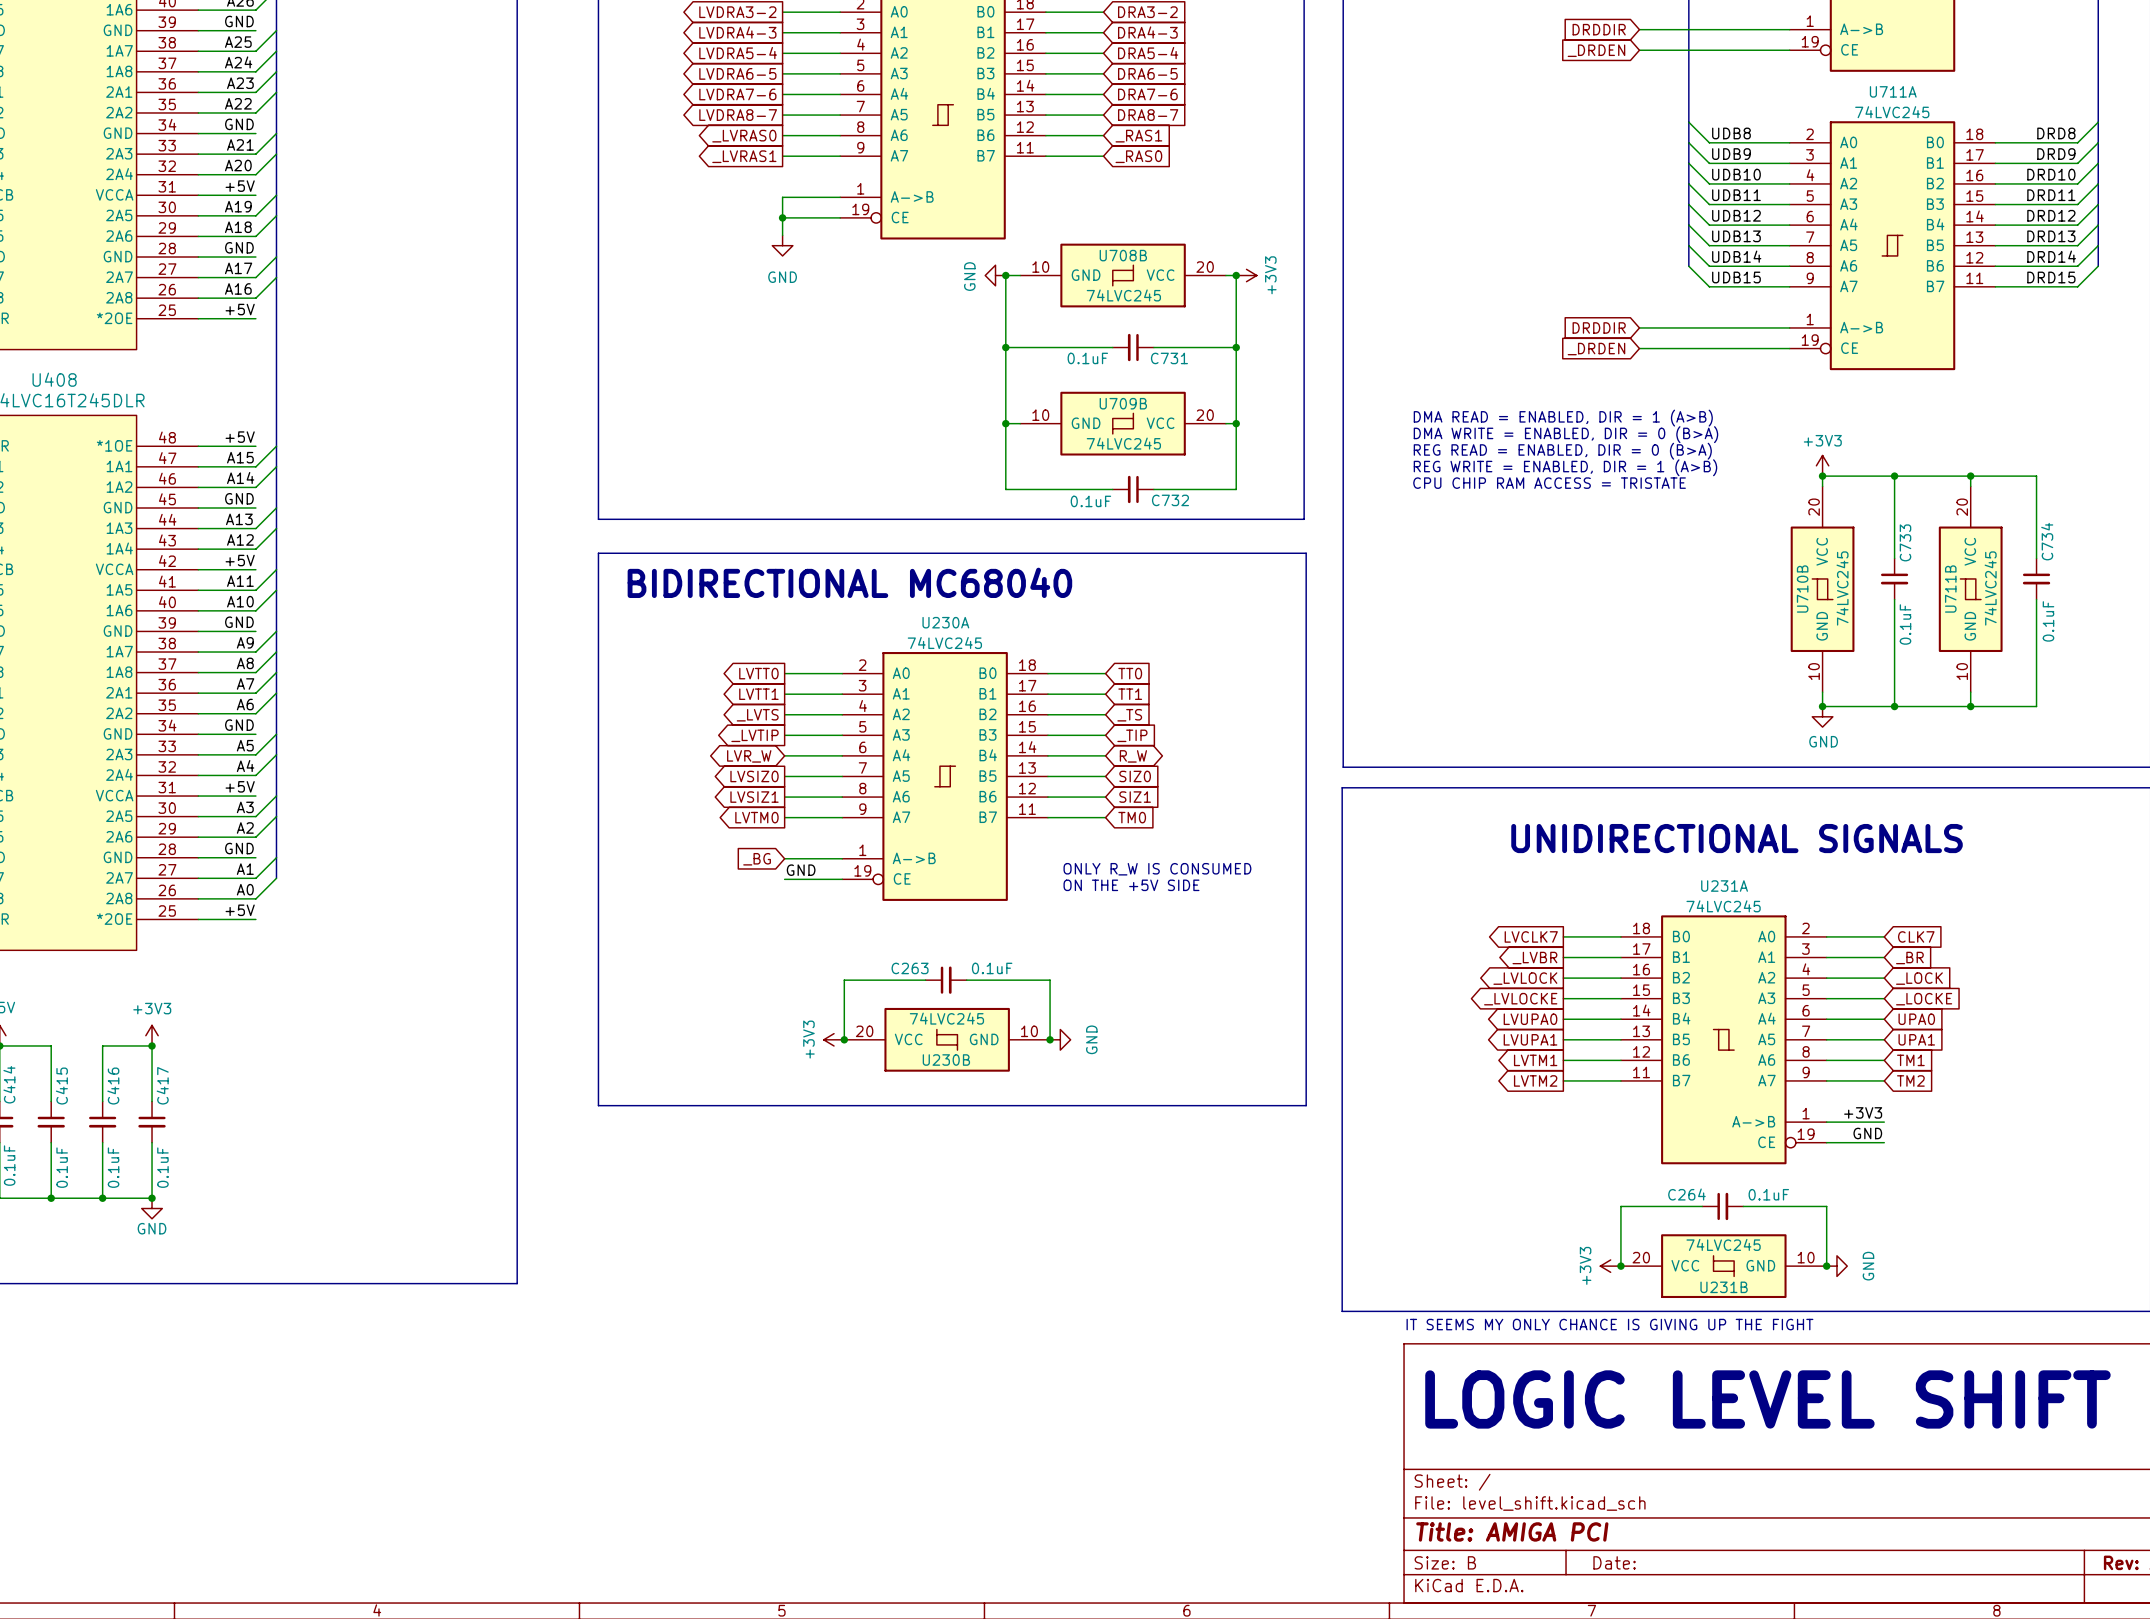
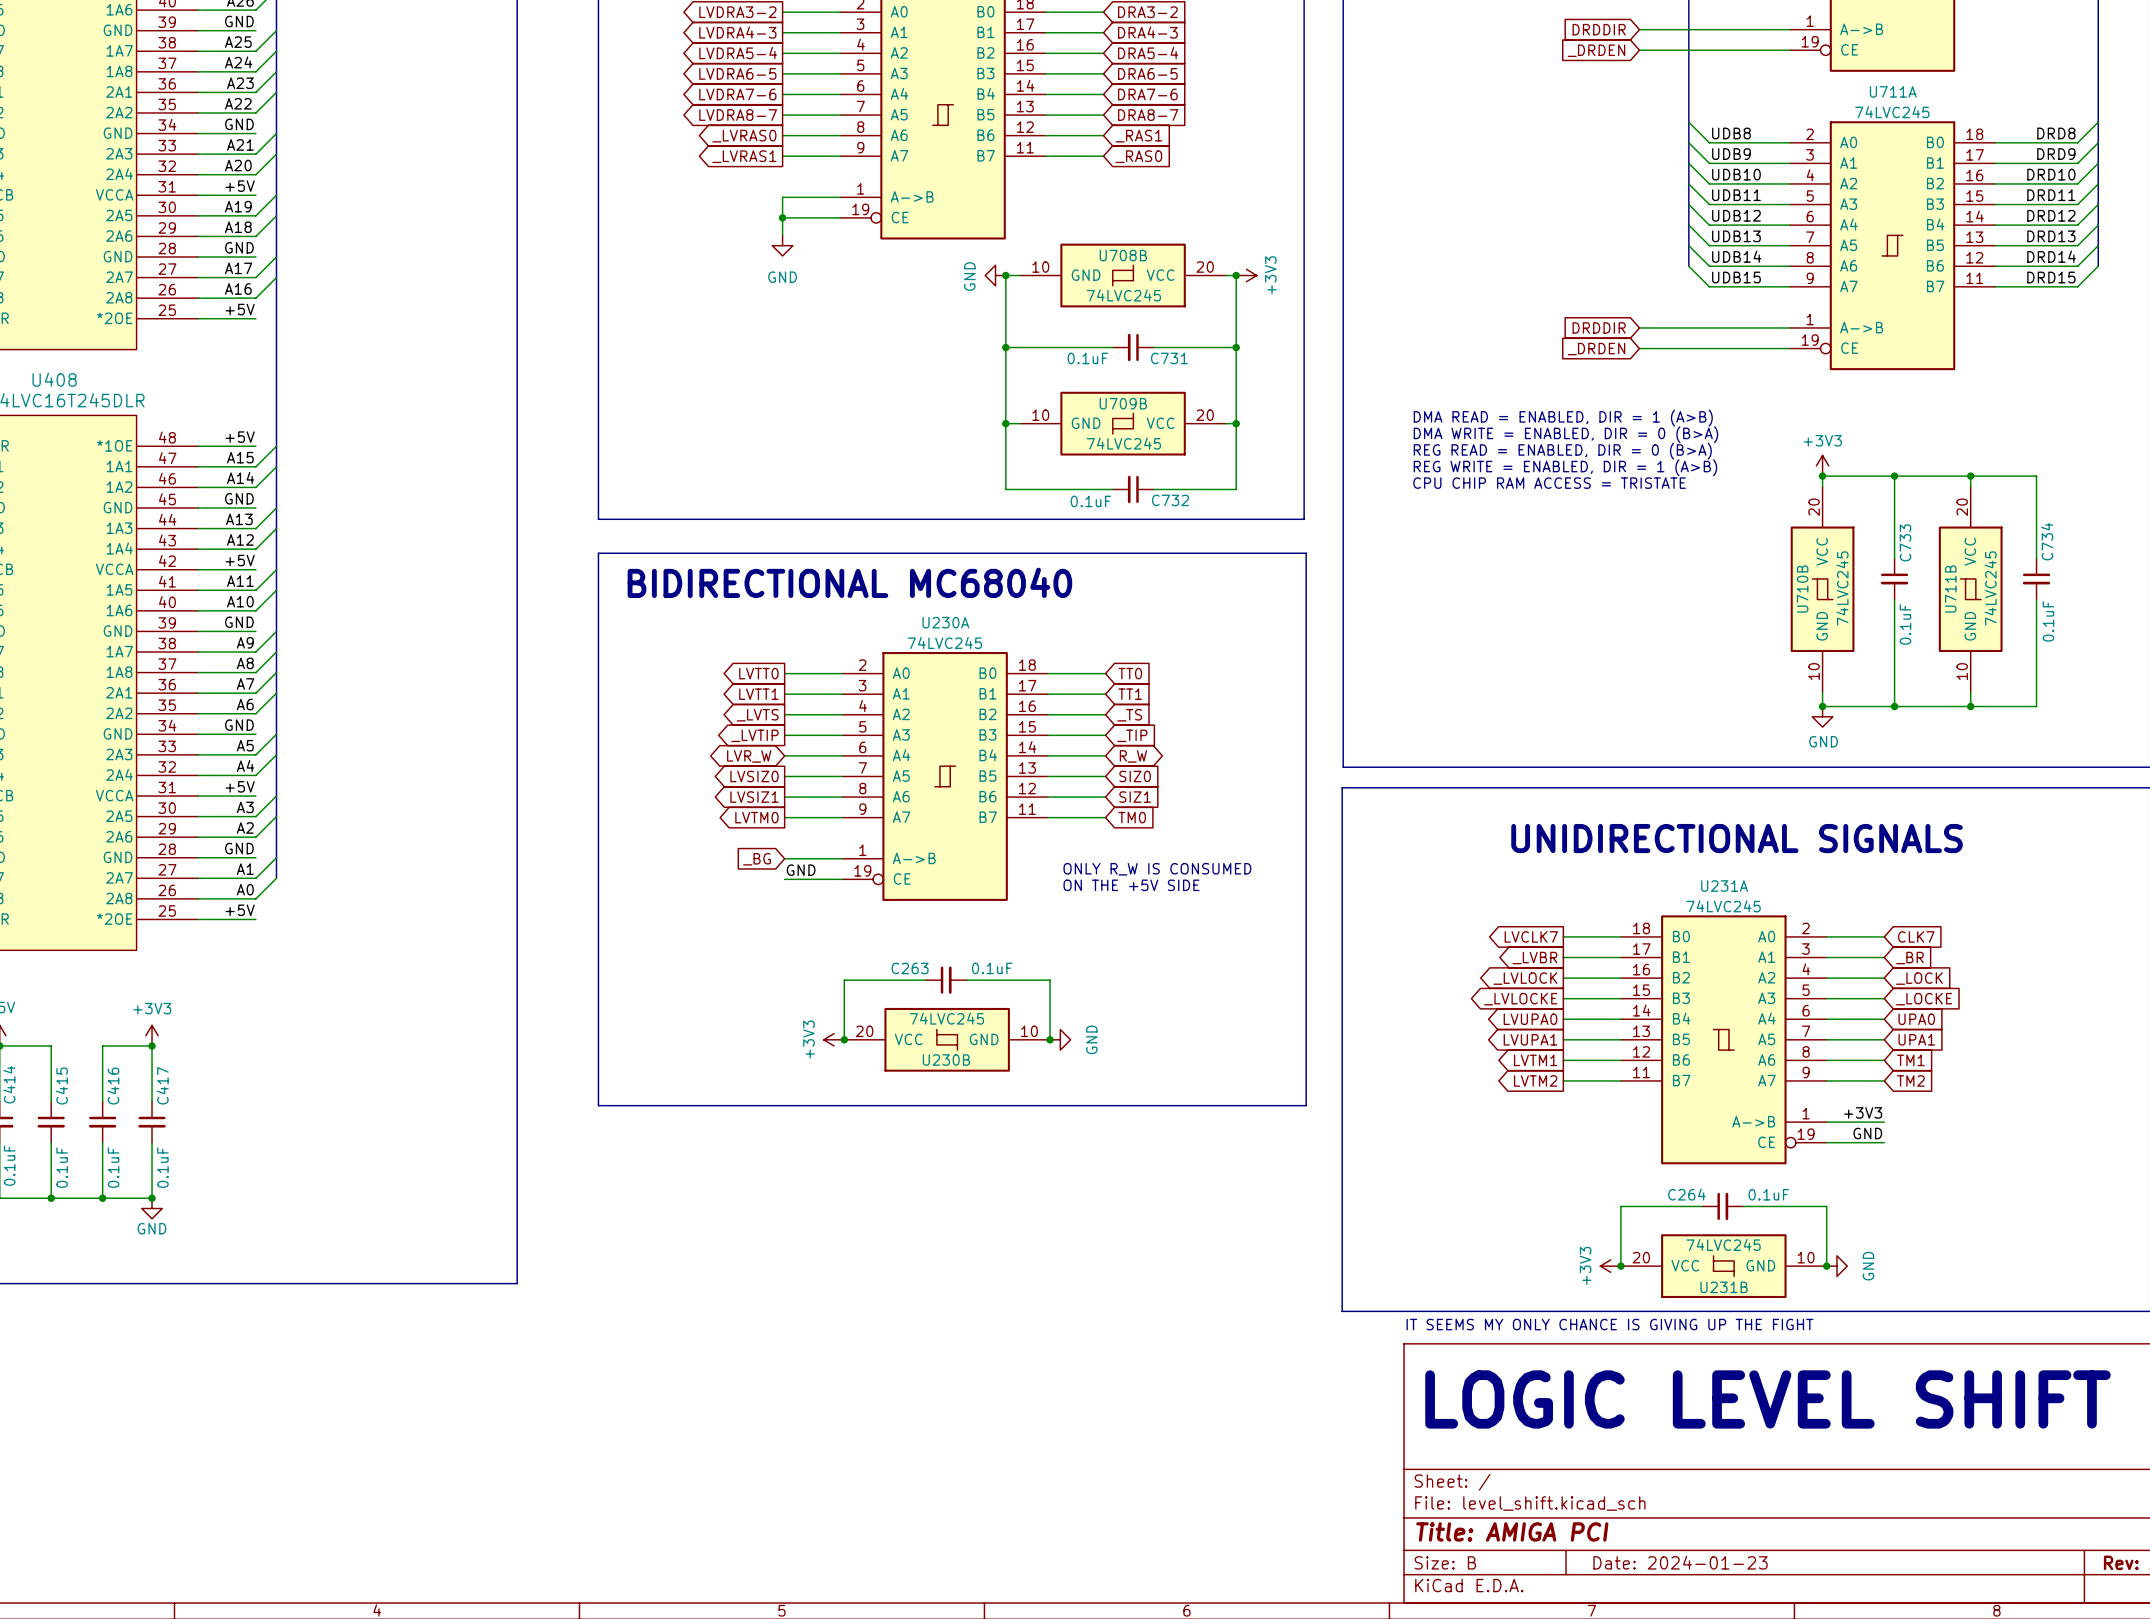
title block: Date: (1614, 1562) -> Date: 2024-01-23 (1680, 1562)

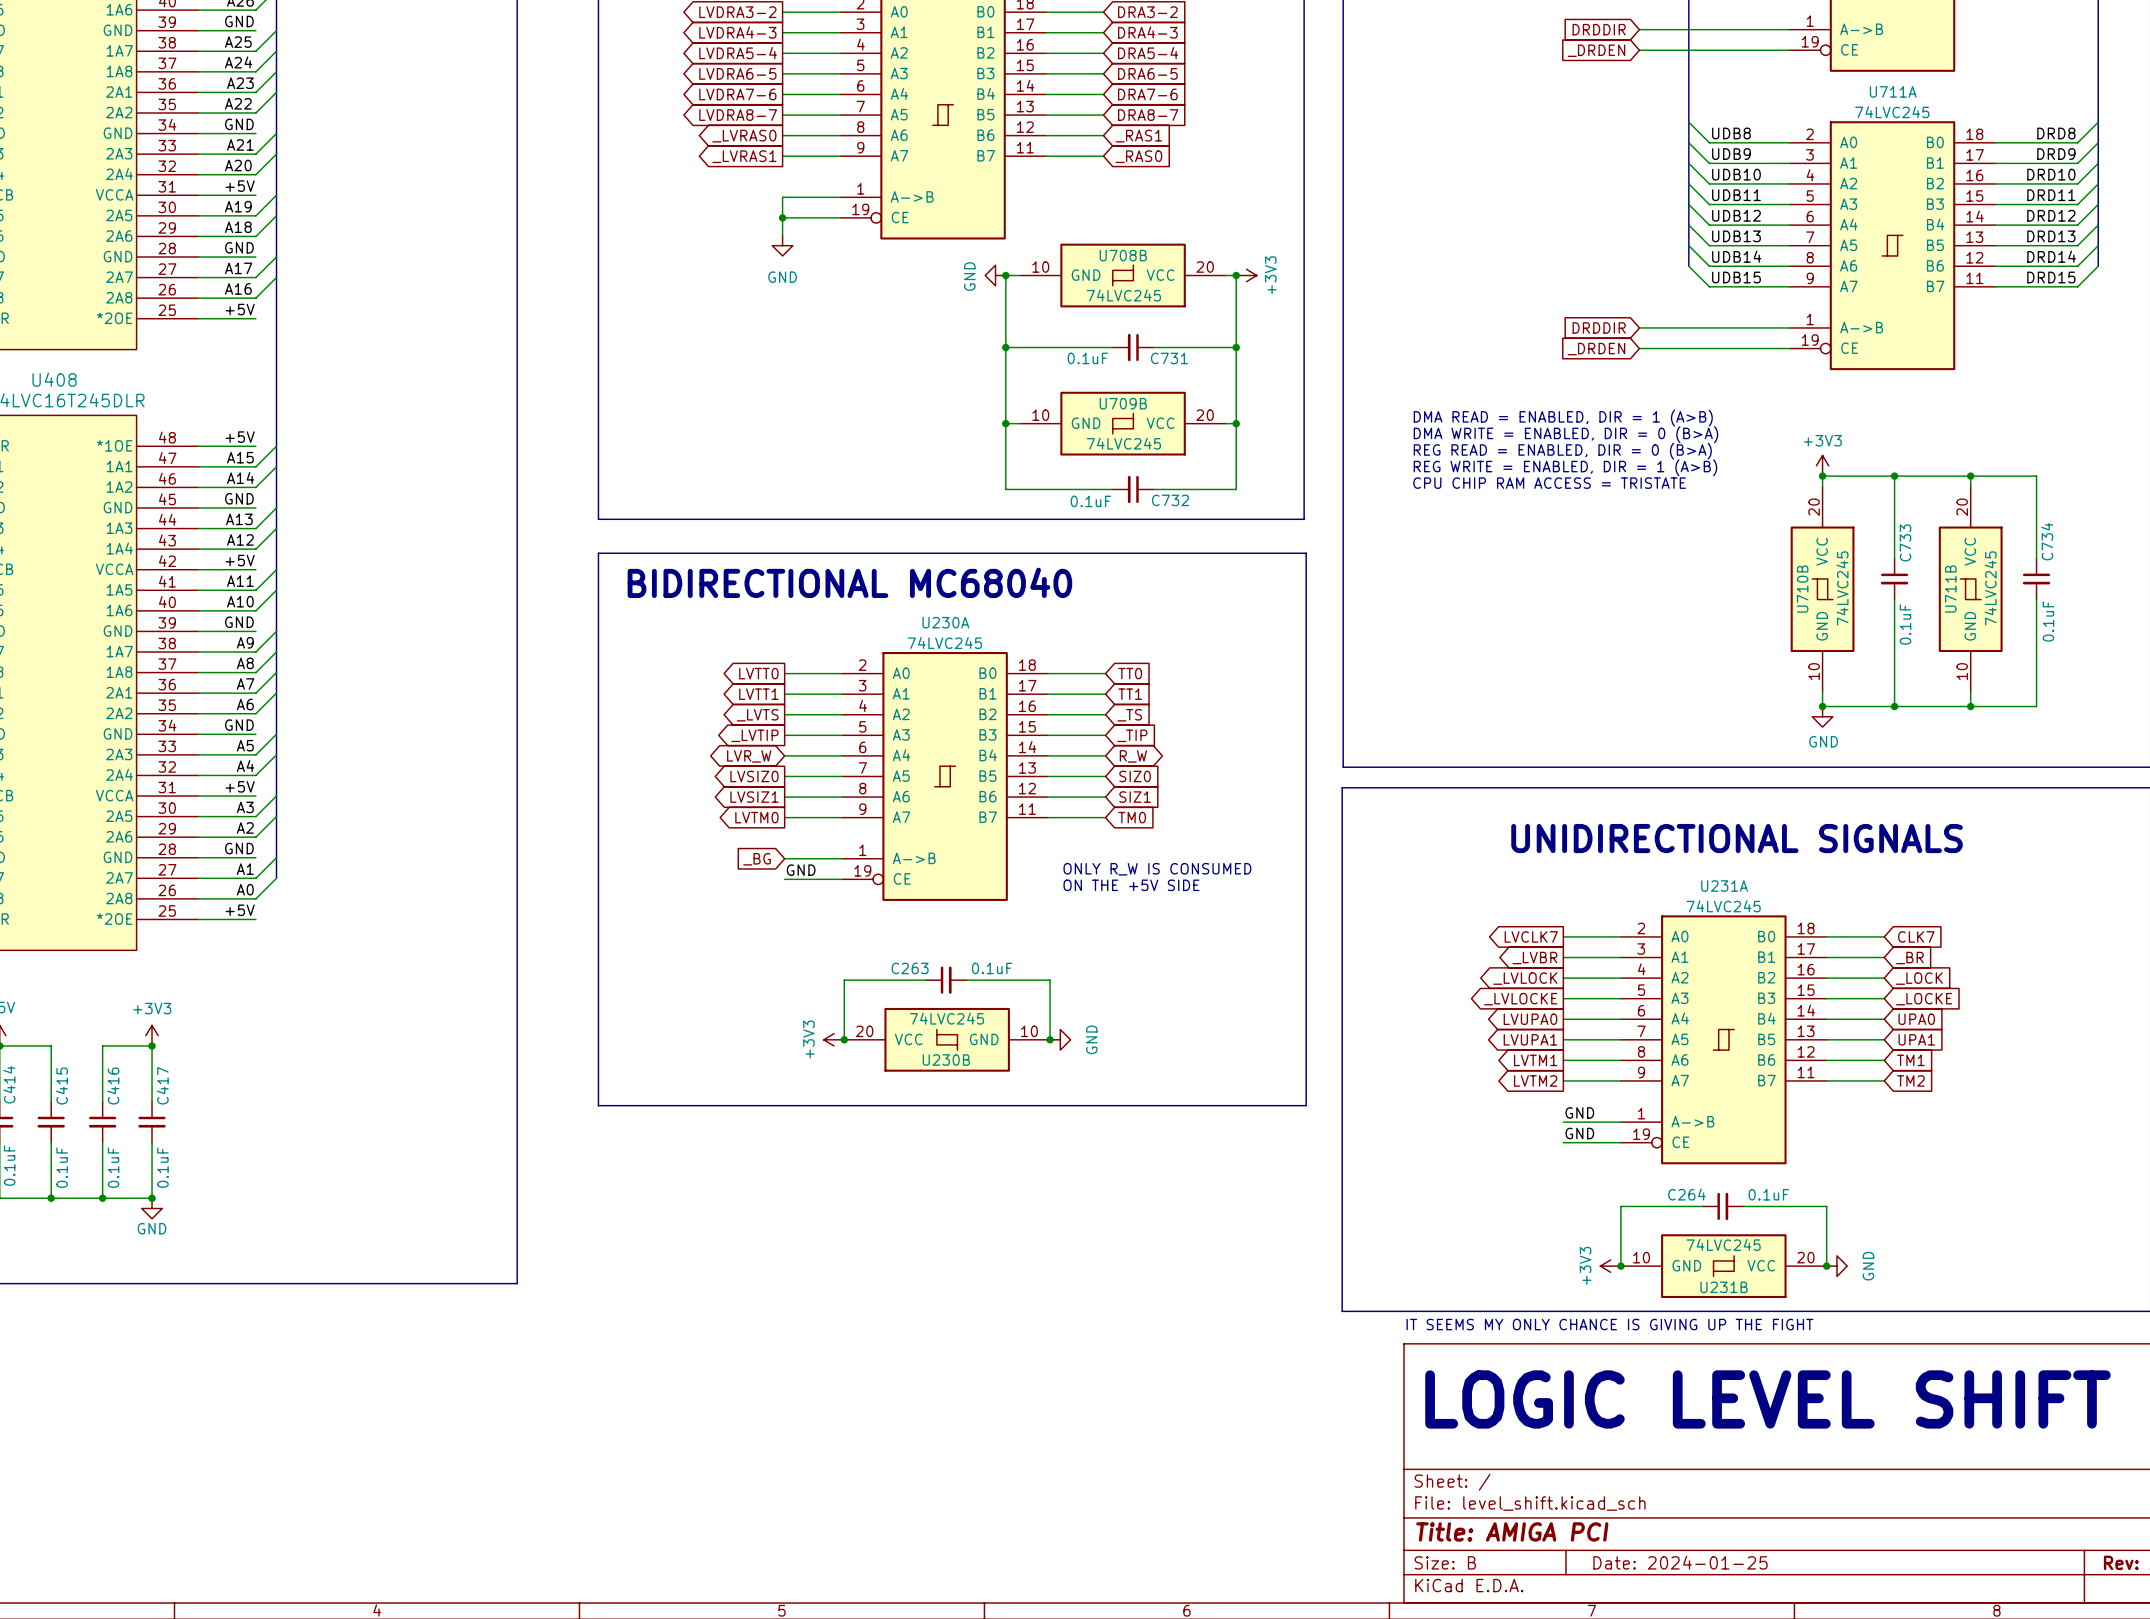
U231A flip: as is (1723, 1039) -> left-right (1723, 1039)
label: none -> GND (1579, 1112)
label: +3V3 (1863, 1112) -> none
wire: none -> (1563, 1122) (1620, 1122)
wire: (1826, 1122) (1884, 1122) -> none
label: none -> GND (1579, 1133)
label: GND (1867, 1133) -> none
wire: none -> (1563, 1142) (1620, 1142)
wire: (1826, 1142) (1884, 1142) -> none
U231B flip: as is (1723, 1266) -> left-right (1723, 1266)
title block: Date: 2024-01-23 (1680, 1562) -> Date: 2024-01-25 (1680, 1562)

